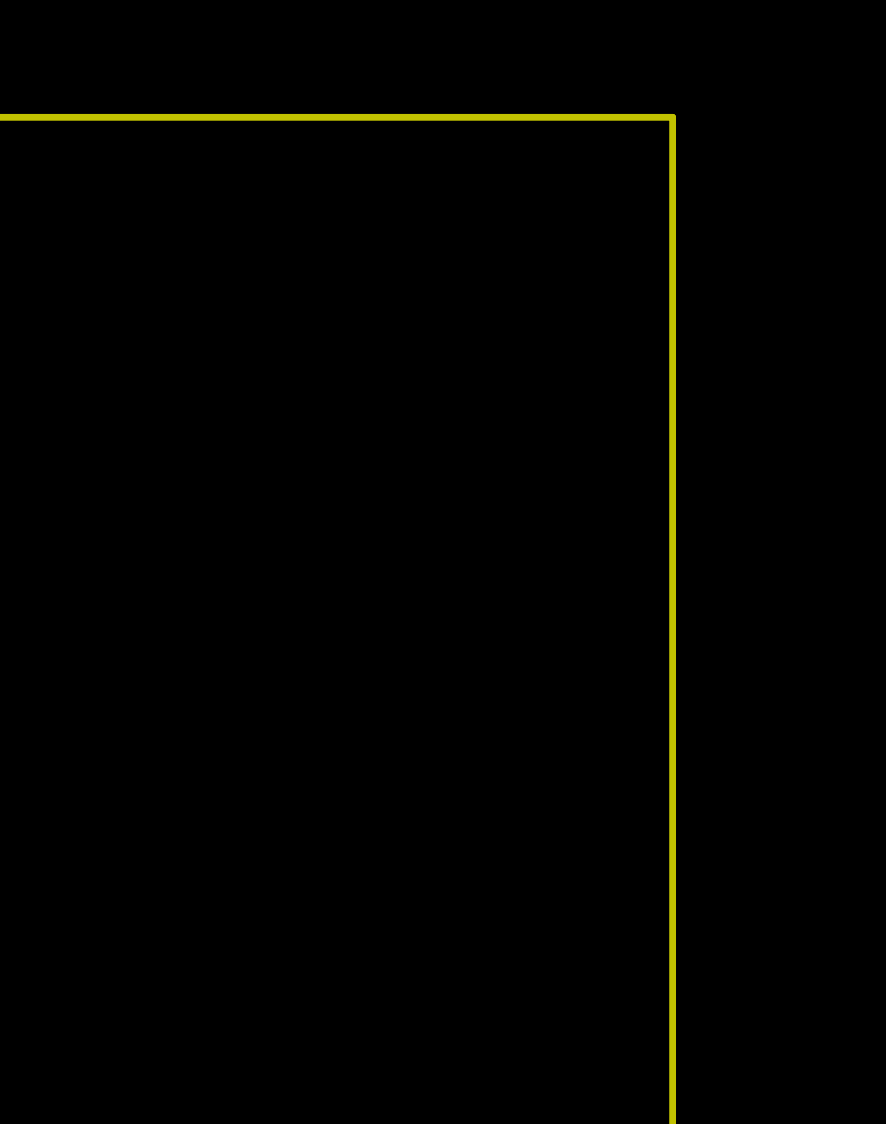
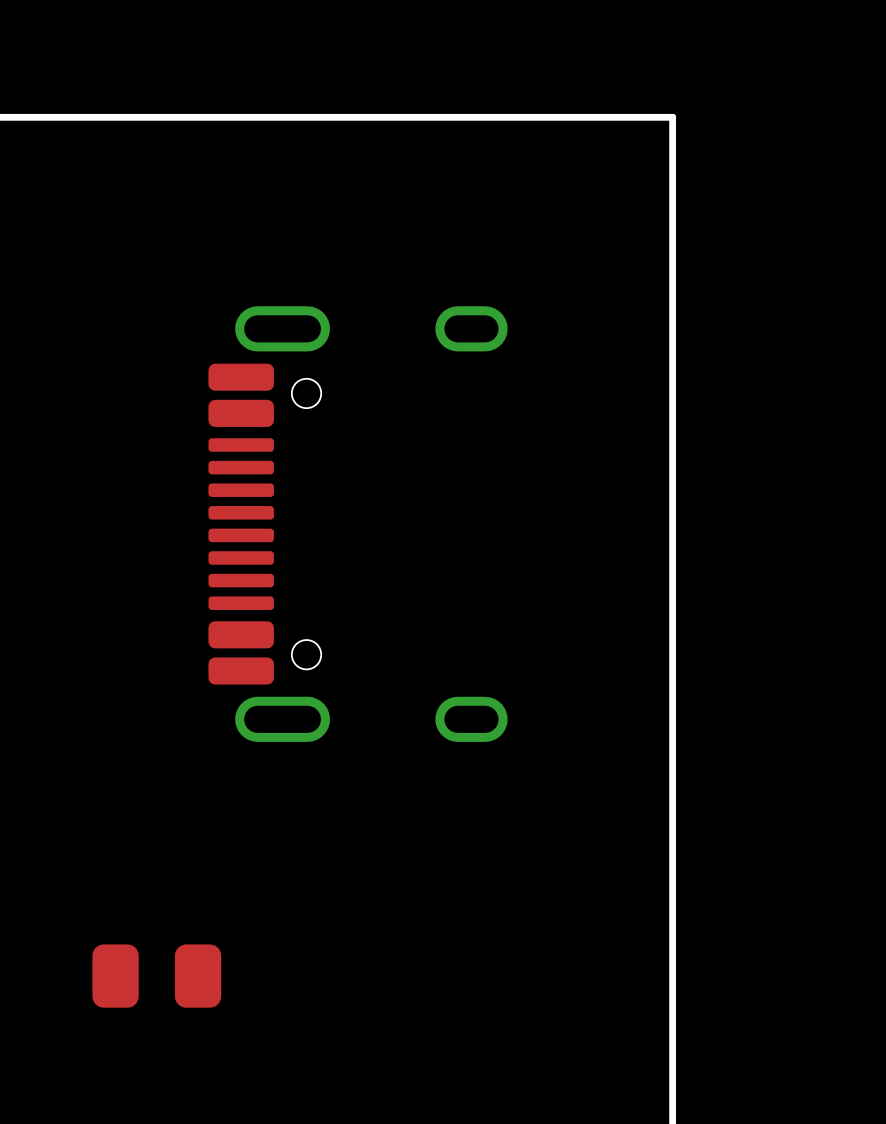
part: none -> (358, 524)
part: none -> (156, 976)

